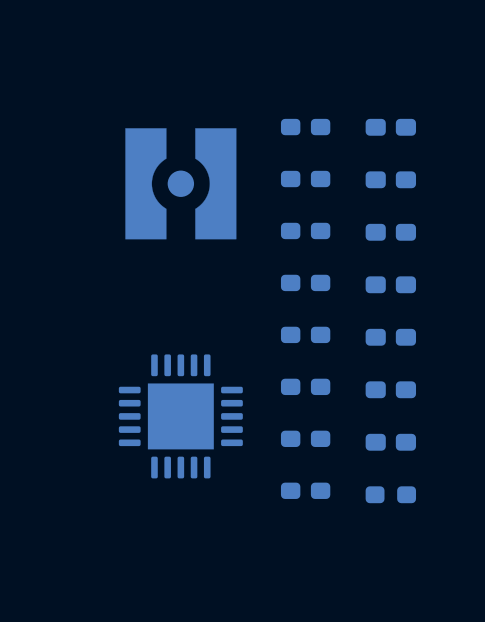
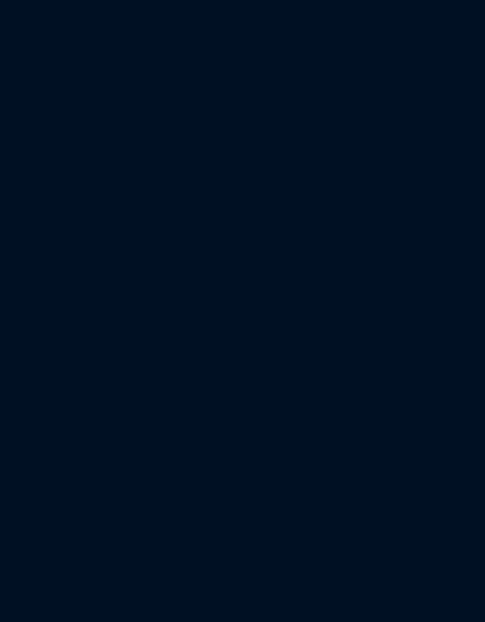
part: (305, 127) -> none
part: (390, 127) -> none
part: (305, 179) -> none
part: (390, 179) -> none
part: (180, 183) -> none
part: (305, 230) -> none
part: (390, 232) -> none
part: (305, 282) -> none
part: (390, 284) -> none
part: (305, 334) -> none
part: (390, 337) -> none
part: (305, 386) -> none
part: (390, 389) -> none
part: (180, 416) -> none
part: (305, 438) -> none
part: (390, 442) -> none
part: (305, 490) -> none
part: (390, 494) -> none

